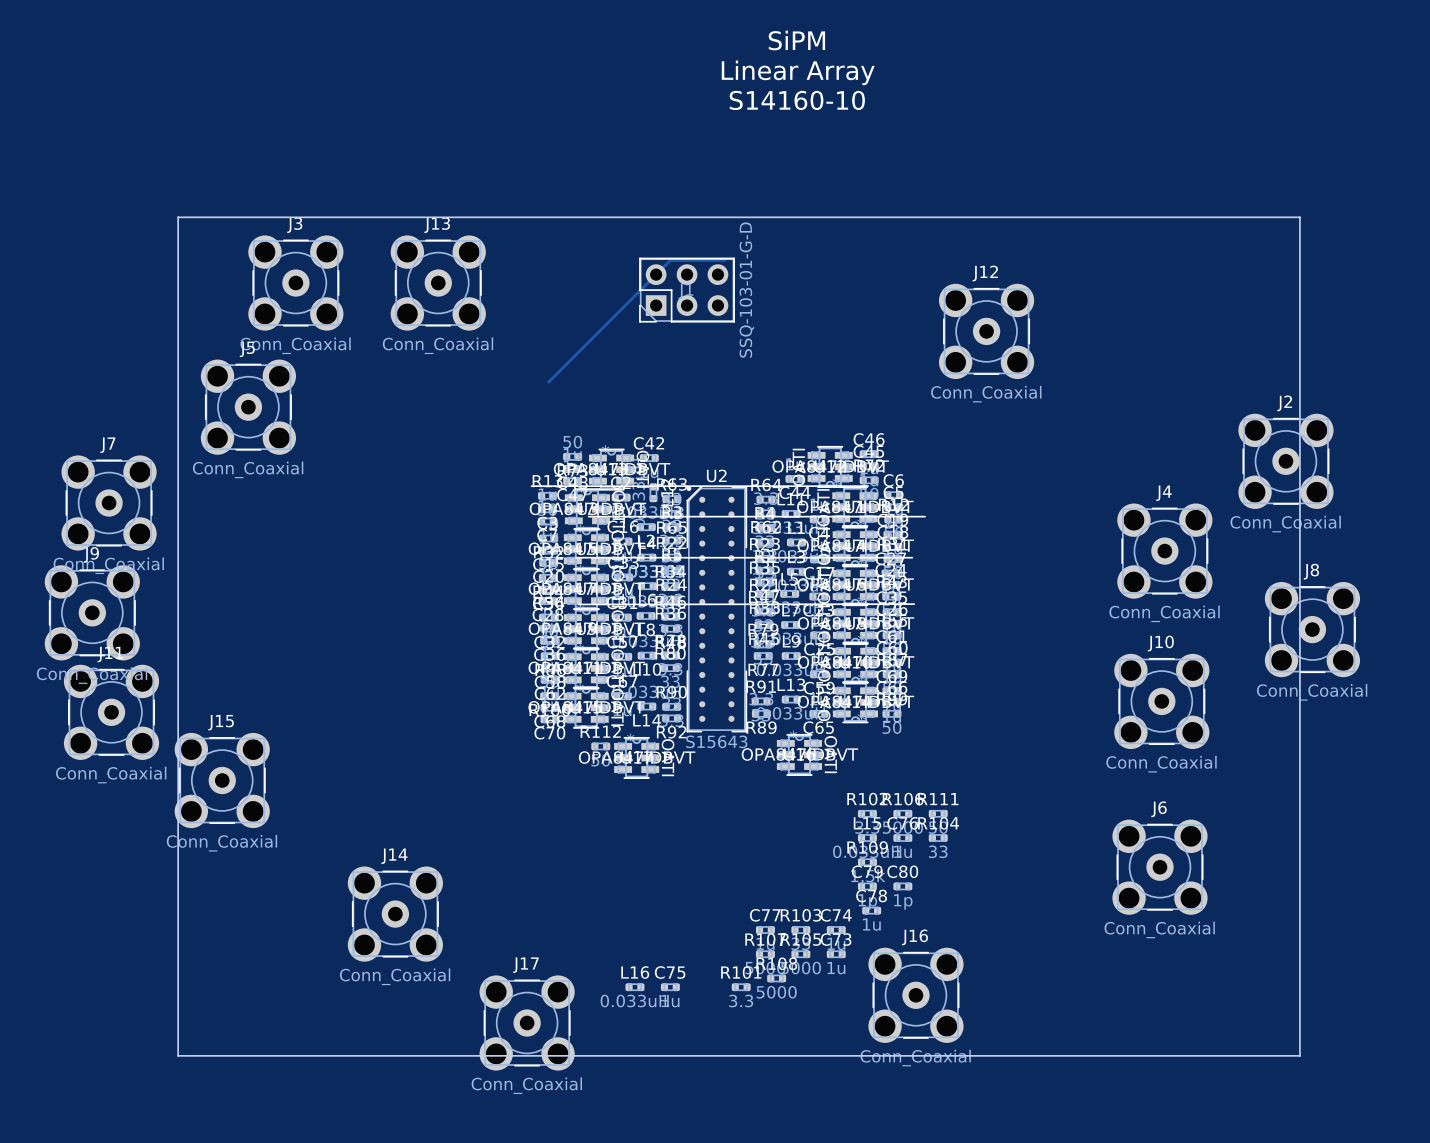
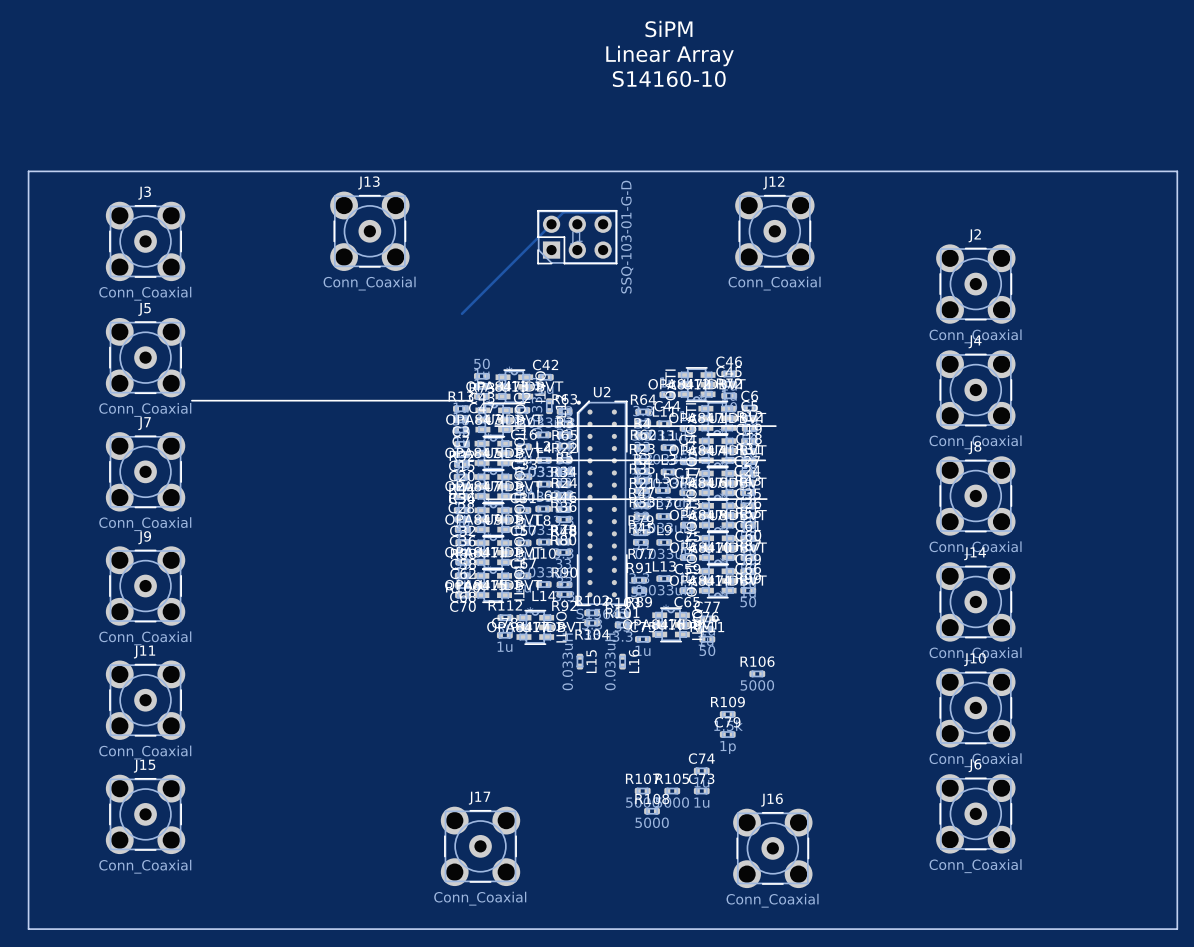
board edge: (178, 217) (1299, 217) (1299, 1055) (178, 1055) (178, 217) -> (28, 171) (28, 929) (1177, 929) (1177, 171) (28, 171)
J3 position: (295, 283) -> (145, 241)
J12 position: (986, 331) -> (774, 231)
J5 position: (248, 407) -> (145, 357)
J2 position: (1285, 461) -> (975, 284)
line: none -> (191, 400) (447, 400)
line: (561, 486) (868, 486) -> none
J7 position: (109, 503) -> (145, 471)
J4 position: (1164, 551) -> (975, 390)
J9 position: (92, 612) -> (145, 586)
J8 position: (1312, 629) -> (975, 495)
J10 position: (1161, 701) -> (975, 707)
J11 position: (111, 712) -> (145, 700)
J15 position: (222, 780) -> (145, 814)
R102 position: (867, 813) -> (592, 612)
R111 position: (938, 813) -> (707, 639)
R104 name position: R104 (938, 823) -> R104 (592, 634)
L15 rotation: 0° (867, 838) -> 90° clockwise (579, 661)
L15 position: (867, 838) -> (579, 661)
C76 position: (902, 838) -> (705, 629)
R104 position: (938, 838) -> (592, 623)
J6 position: (1160, 867) -> (975, 813)
C80: 1p (902, 886) -> none
C78 position: (871, 910) -> (504, 635)
J14 position: (395, 914) -> (975, 601)
C77 position: (765, 930) -> (707, 619)
R103 position: (800, 930) -> (622, 614)
L16 rotation: 0° (634, 987) -> 90° clockwise (622, 661)
L16 position: (634, 987) -> (622, 661)
C75 position: (670, 987) -> (642, 639)
R101 position: (741, 987) -> (622, 625)
J16 position: (915, 995) -> (772, 848)
J17 position: (527, 1023) -> (480, 846)

